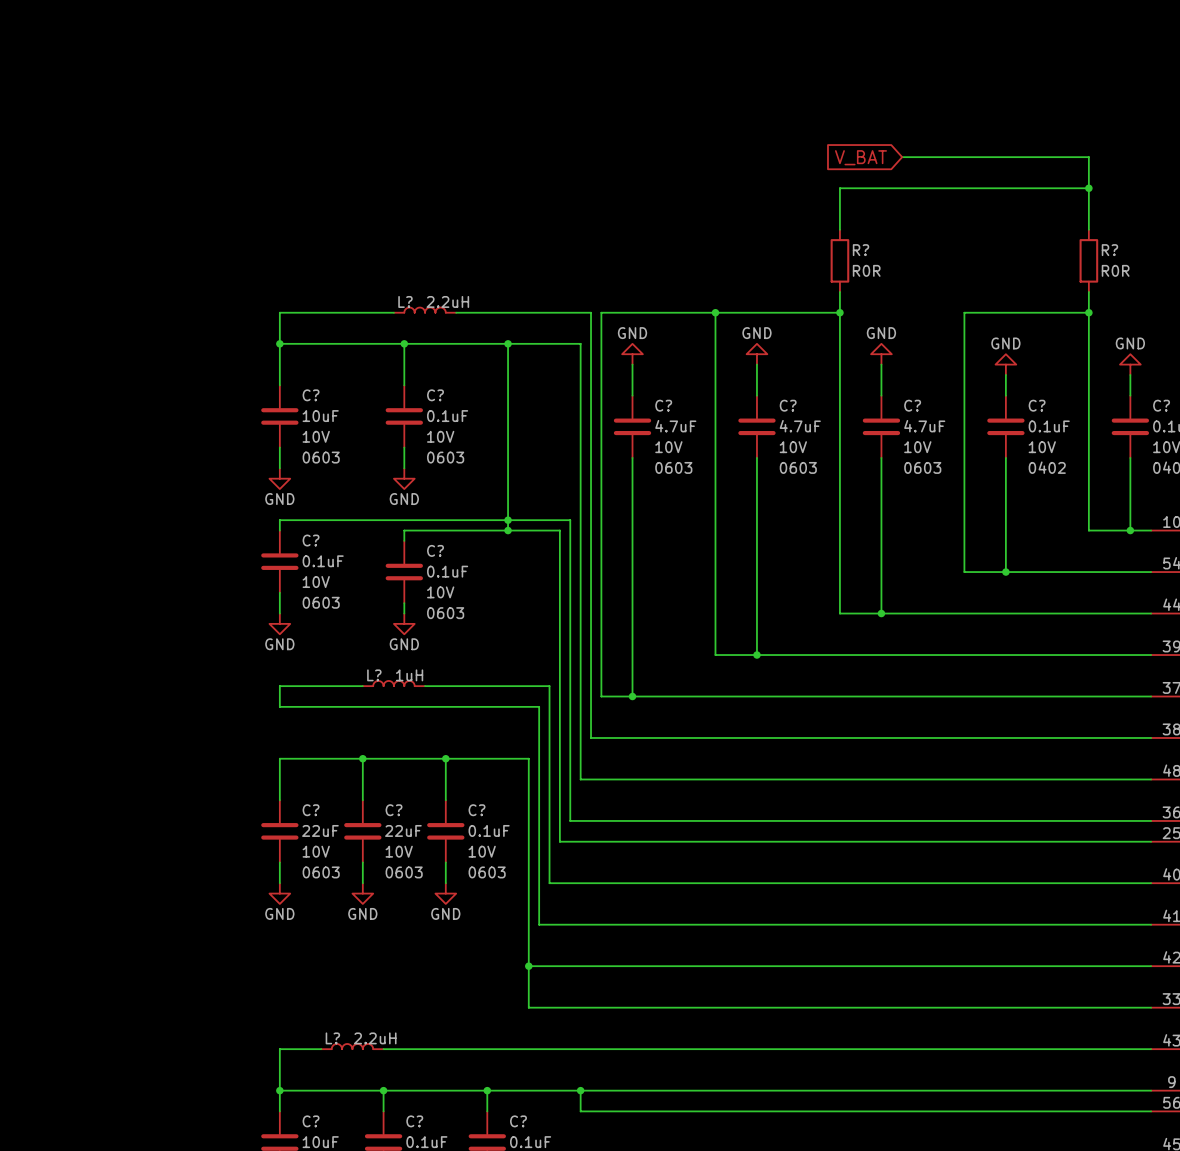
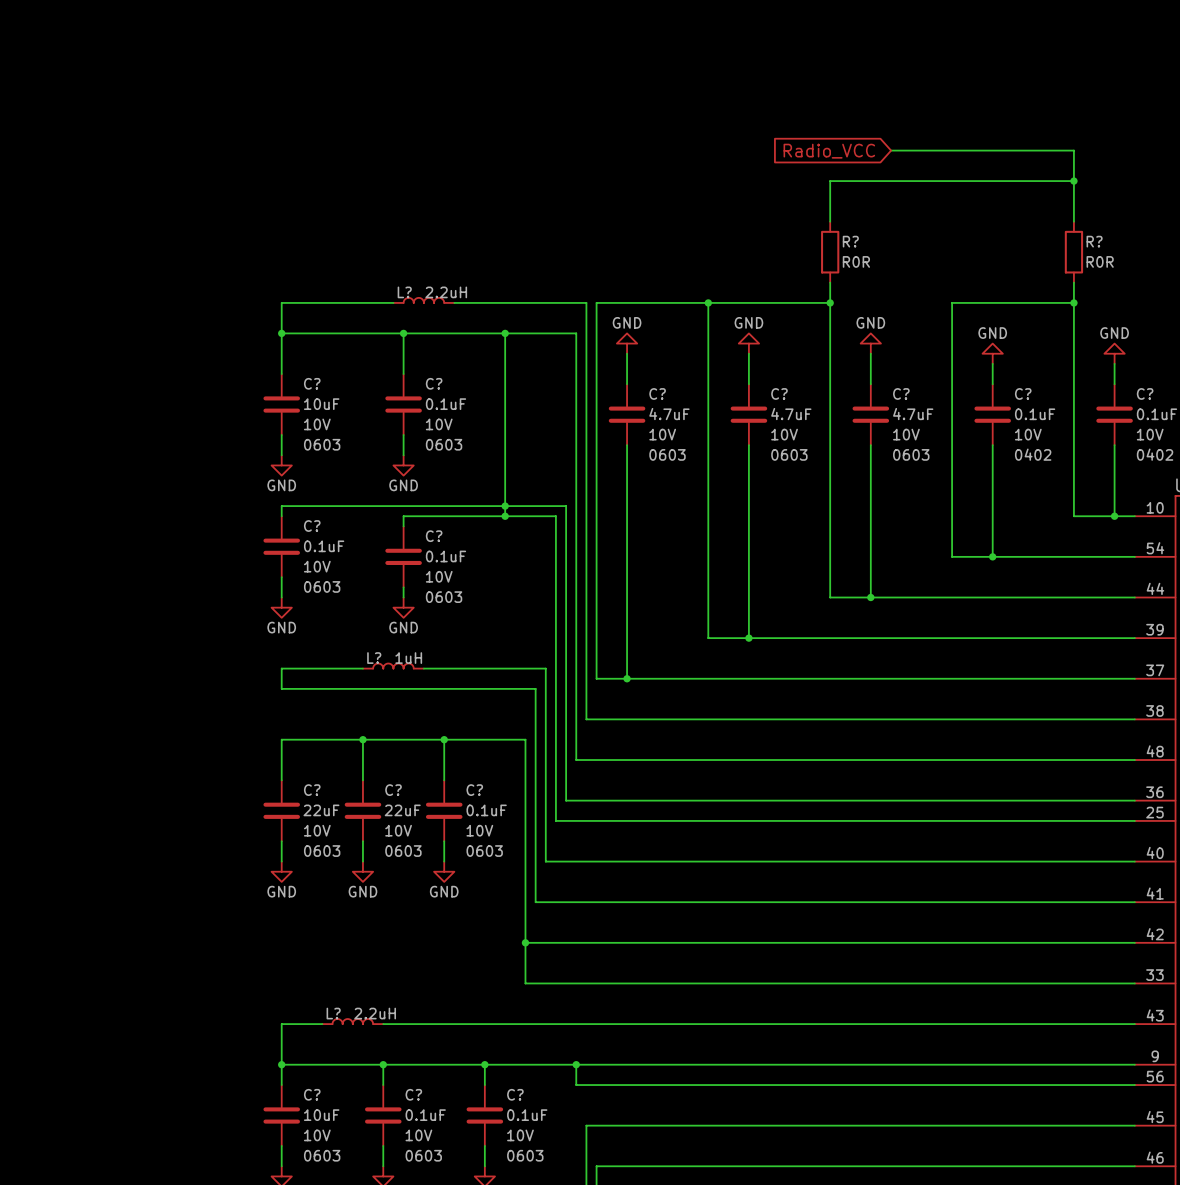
global label: V_BAT (860, 157) -> Radio_VCC (829, 151)

